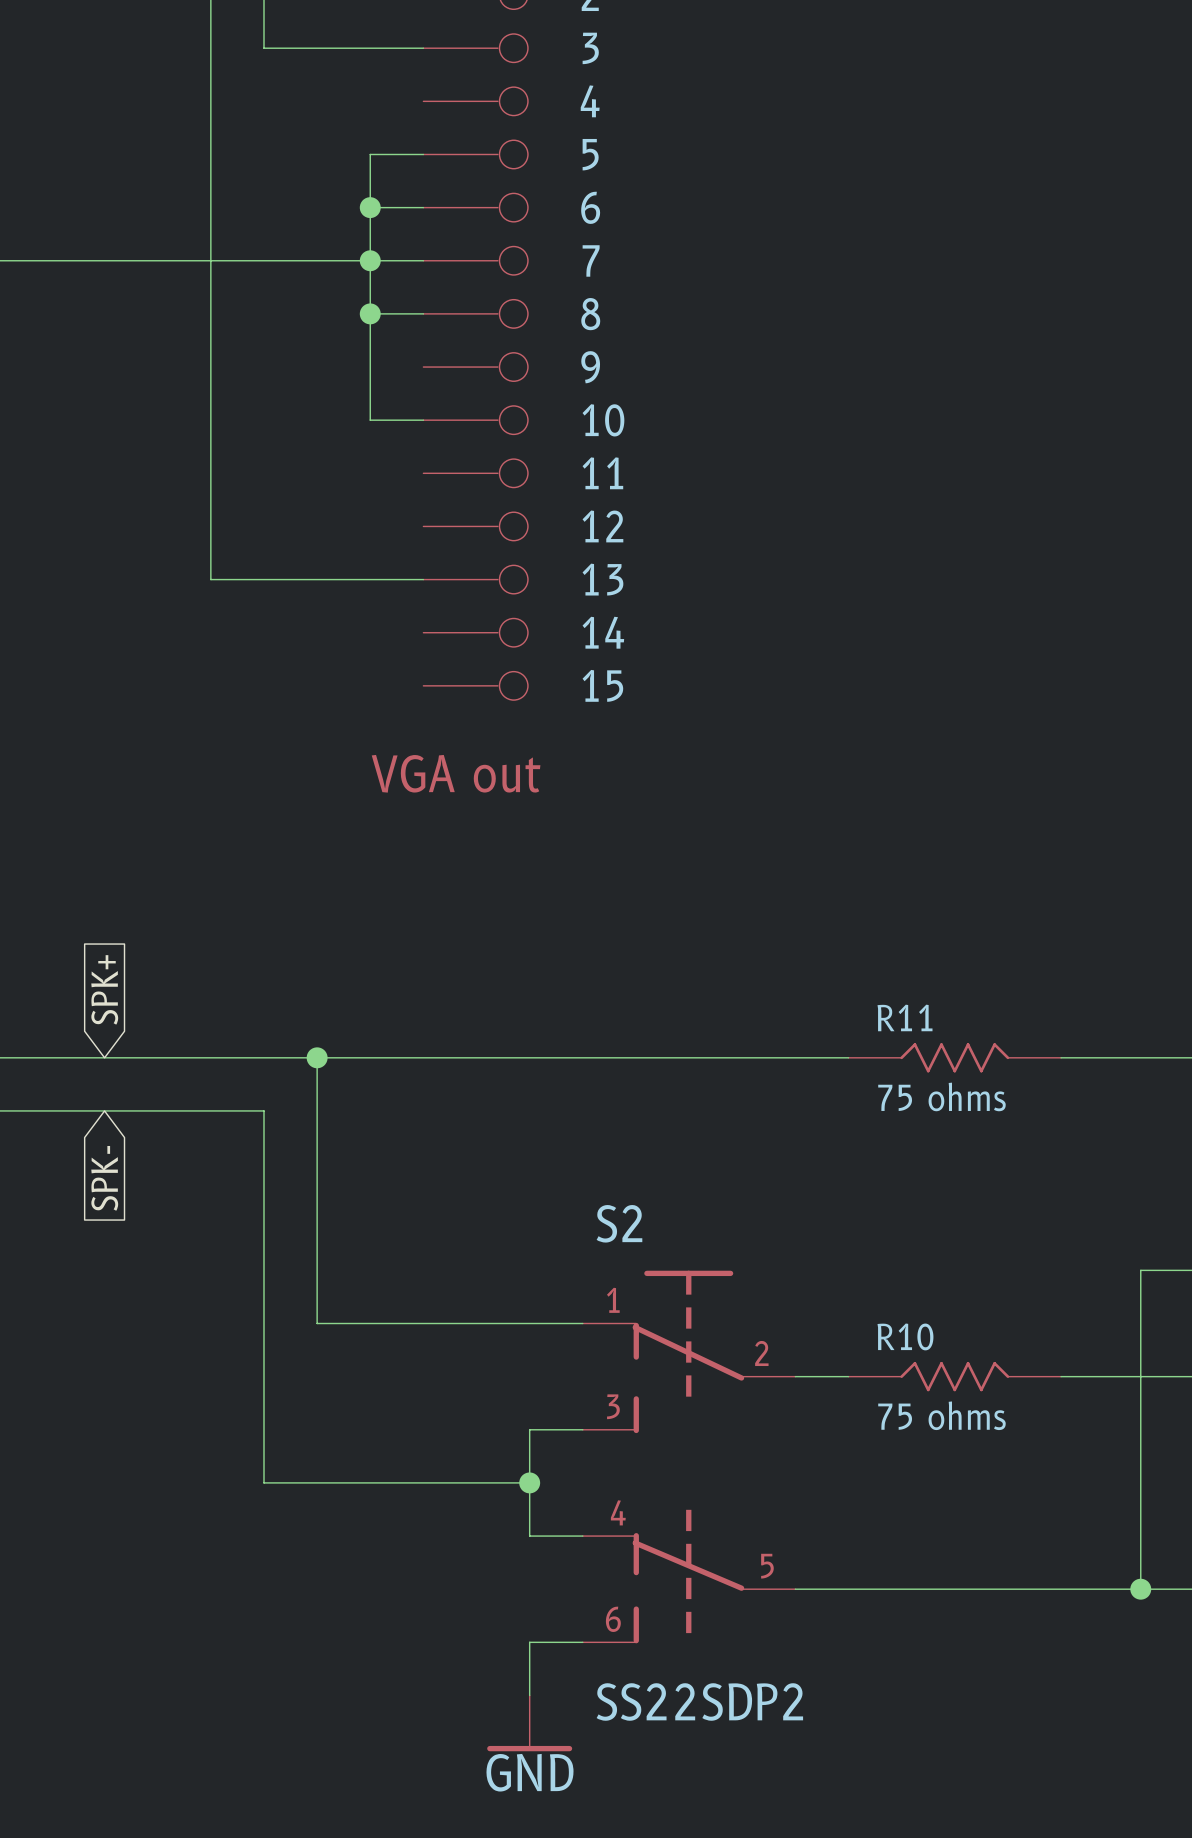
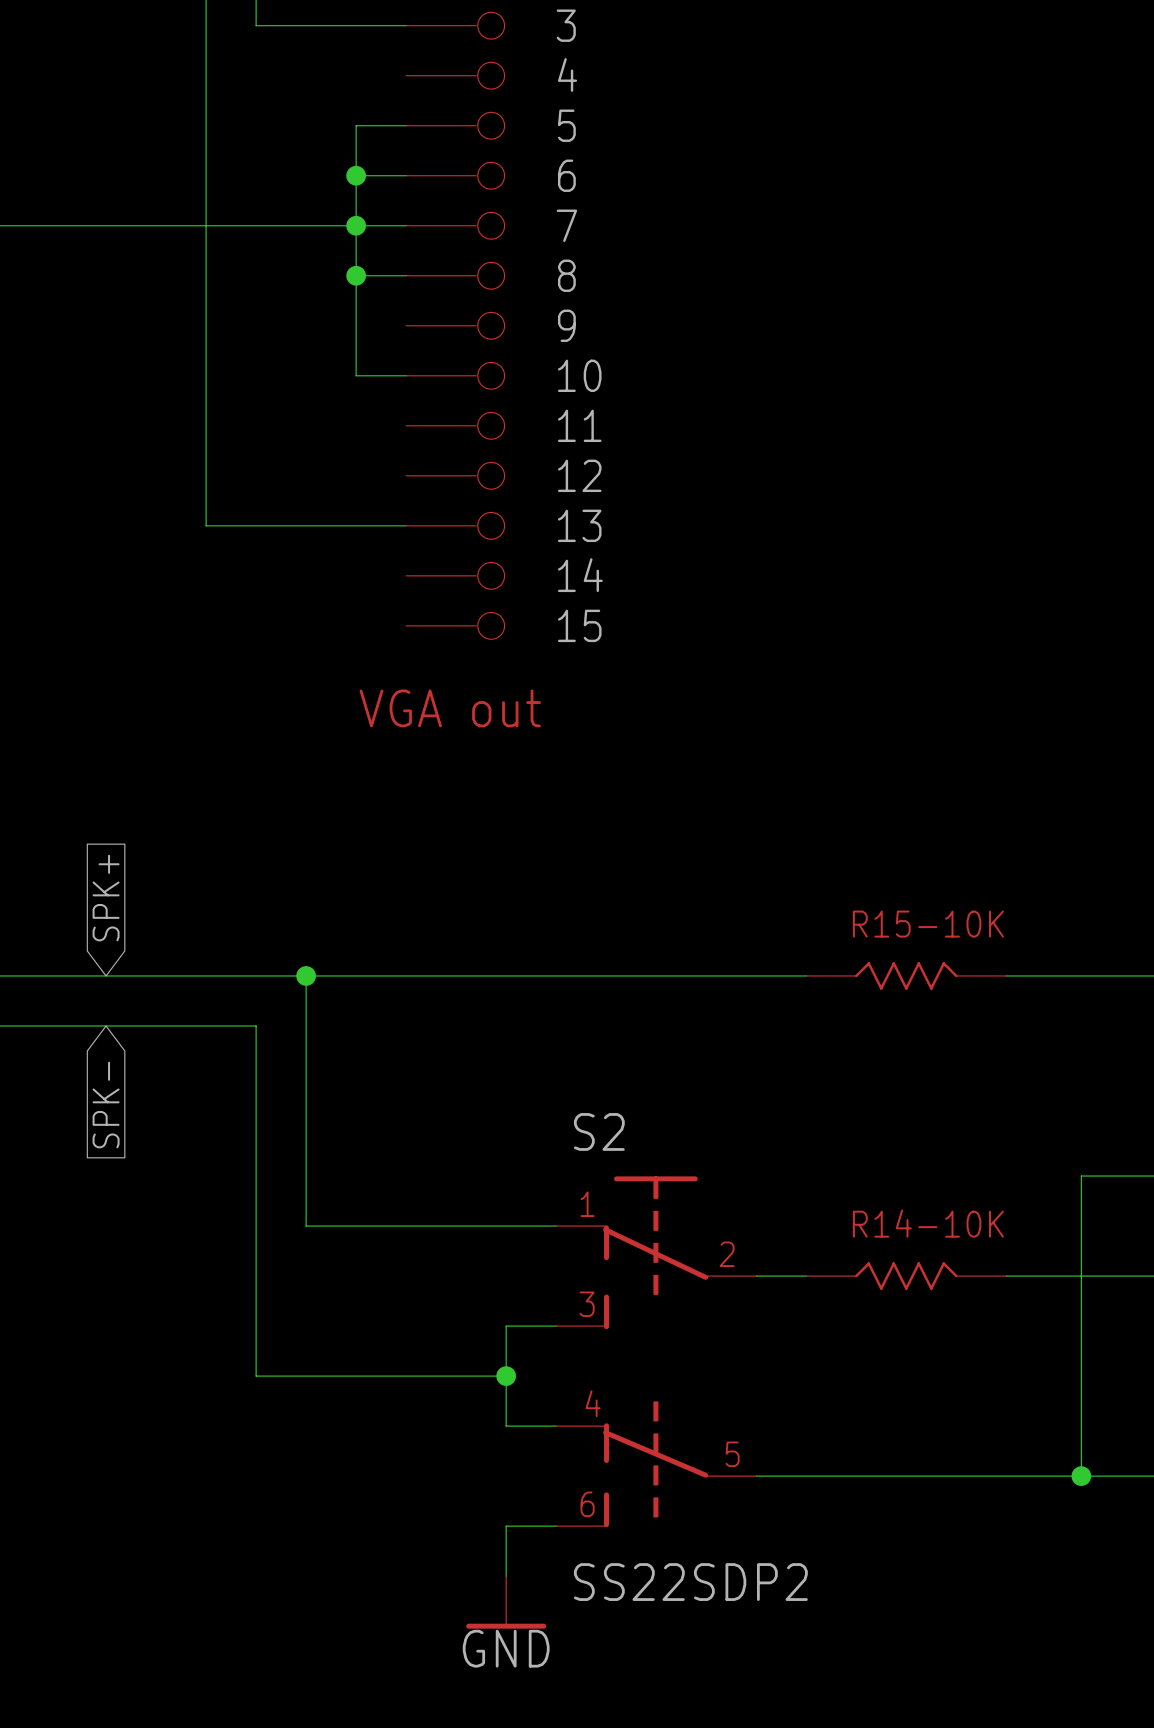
R11 name: R11 (905, 1017) -> R15-10K (928, 924)
R11 value: 75 ohms (941, 1096) -> none
R10 name: R10 (905, 1336) -> R14-10K (928, 1223)
R10 value: 75 ohms (941, 1415) -> none

